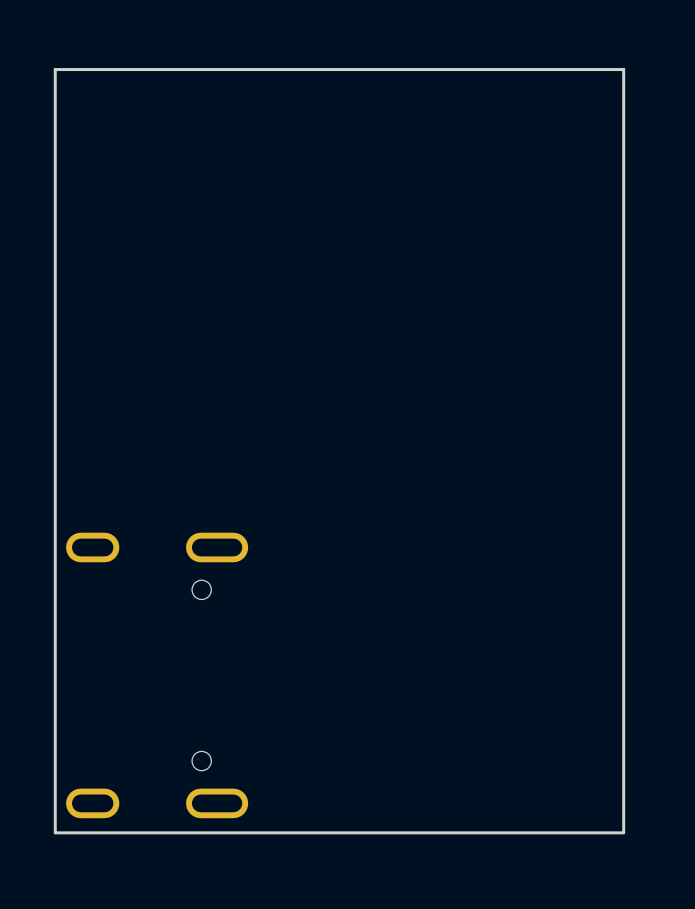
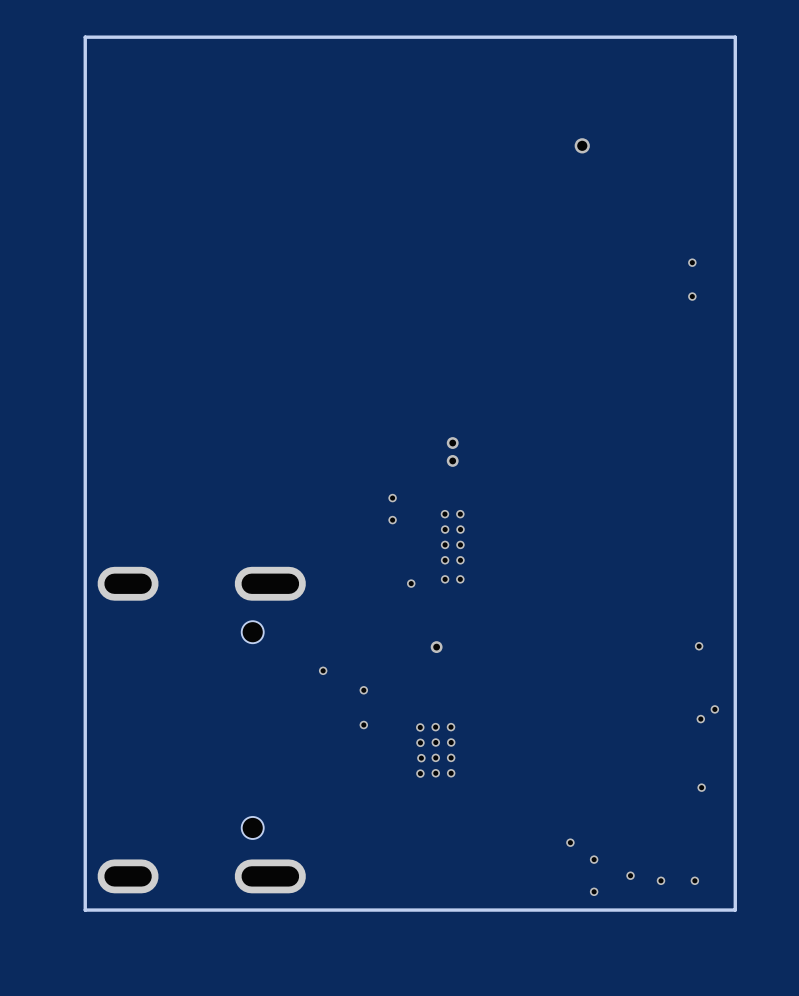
via: none -> (582, 145)
via: none -> (692, 262)
via: none -> (692, 296)
via: none -> (452, 443)
via: none -> (452, 460)
via: none -> (392, 498)
via: none -> (444, 514)
via: none -> (460, 514)
via: none -> (392, 520)
via: none -> (445, 529)
via: none -> (460, 529)
via: none -> (445, 544)
via: none -> (460, 544)
via: none -> (445, 560)
via: none -> (460, 560)
via: none -> (445, 579)
via: none -> (460, 579)
via: none -> (411, 583)
via: none -> (436, 647)
via: none -> (699, 646)
via: none -> (323, 670)
via: none -> (363, 690)
via: none -> (714, 709)
via: none -> (700, 719)
via: none -> (363, 725)
via: none -> (435, 727)
via: none -> (451, 727)
via: none -> (420, 727)
via: none -> (420, 742)
via: none -> (435, 742)
via: none -> (451, 742)
via: none -> (435, 757)
via: none -> (451, 757)
via: none -> (421, 758)
via: none -> (420, 773)
via: none -> (435, 773)
via: none -> (451, 773)
via: none -> (701, 787)
via: none -> (570, 842)
via: none -> (594, 859)
via: none -> (630, 875)
via: none -> (661, 880)
via: none -> (694, 880)
via: none -> (594, 891)

